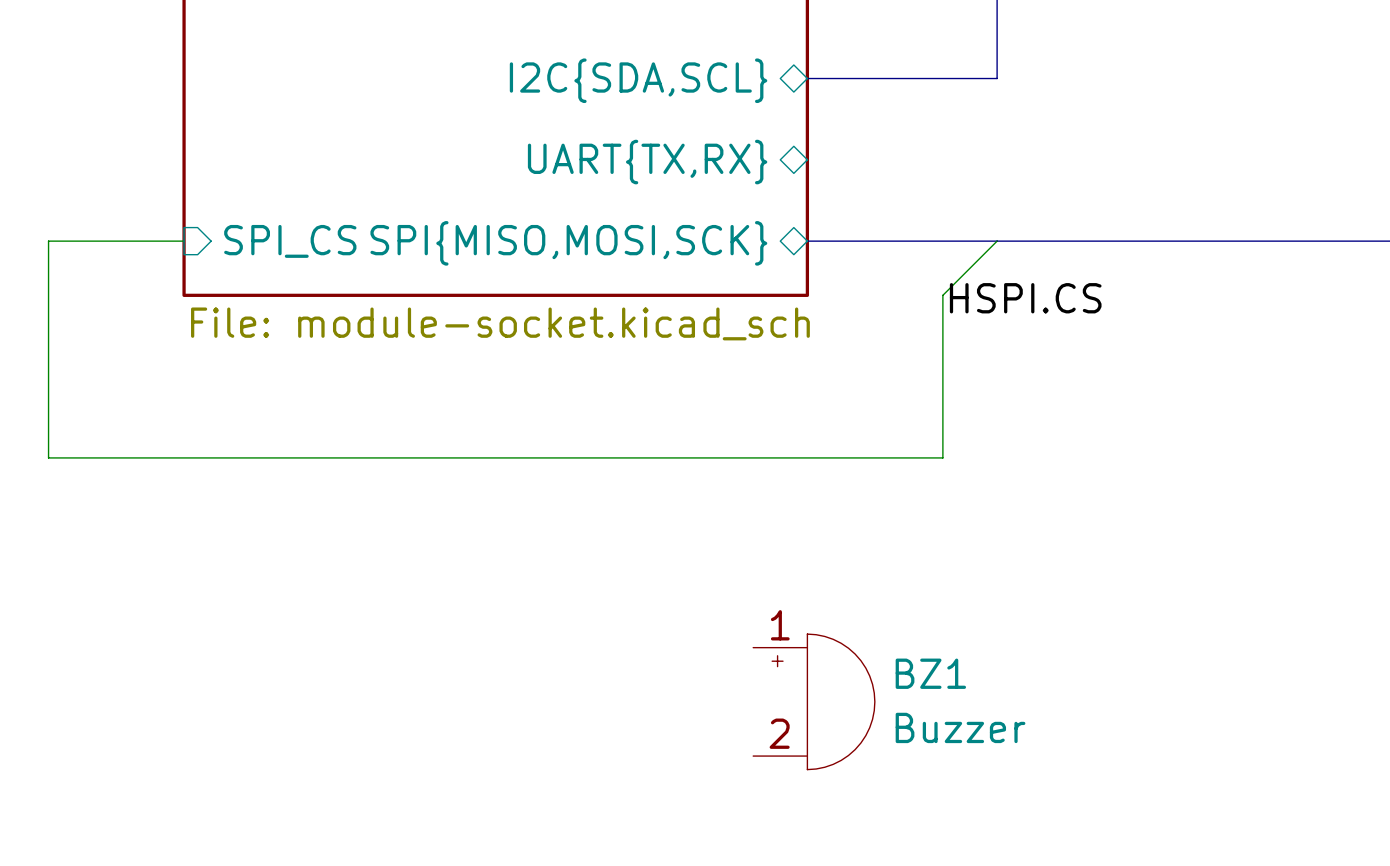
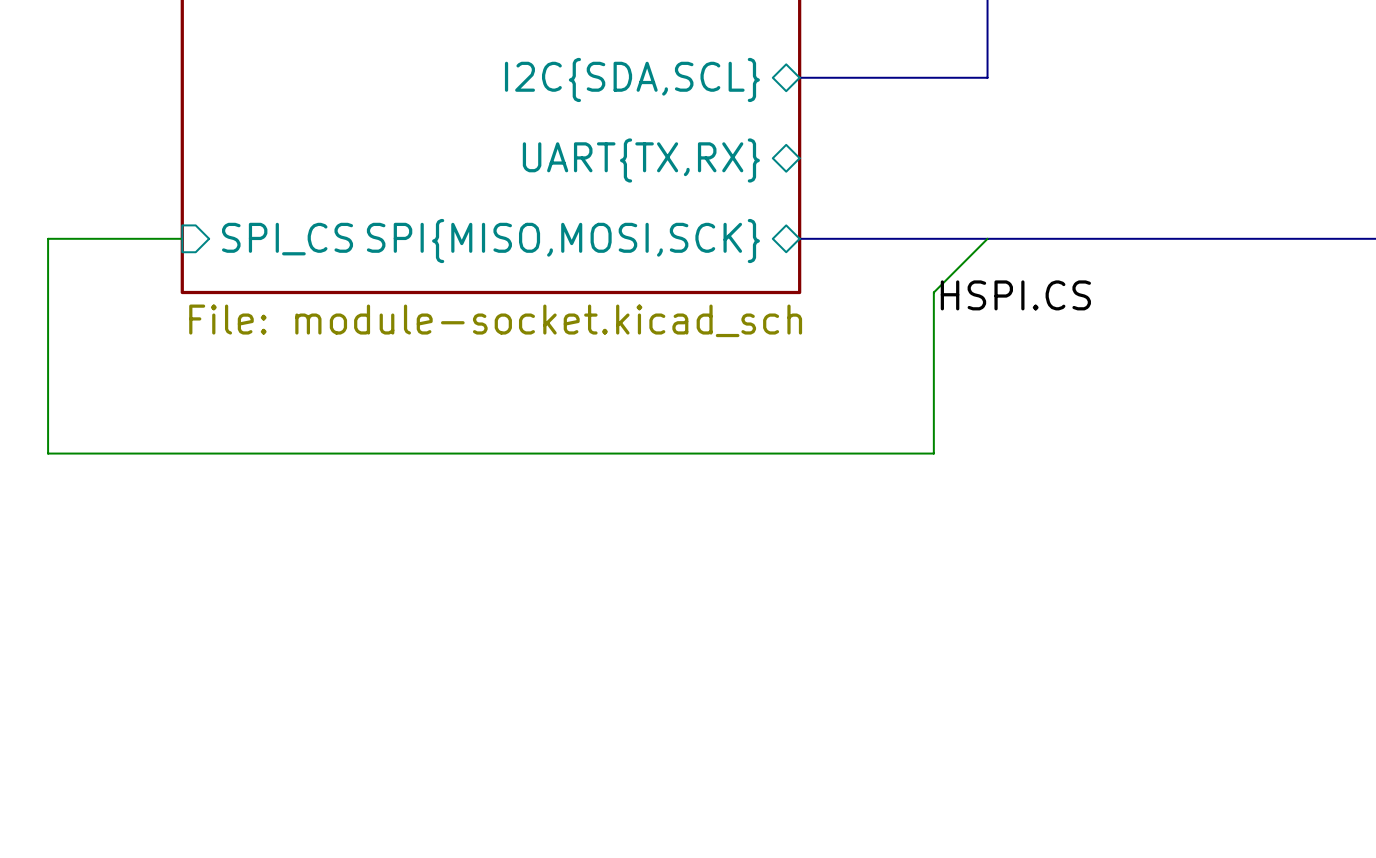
BZ1: Buzzer (814, 701) -> none

